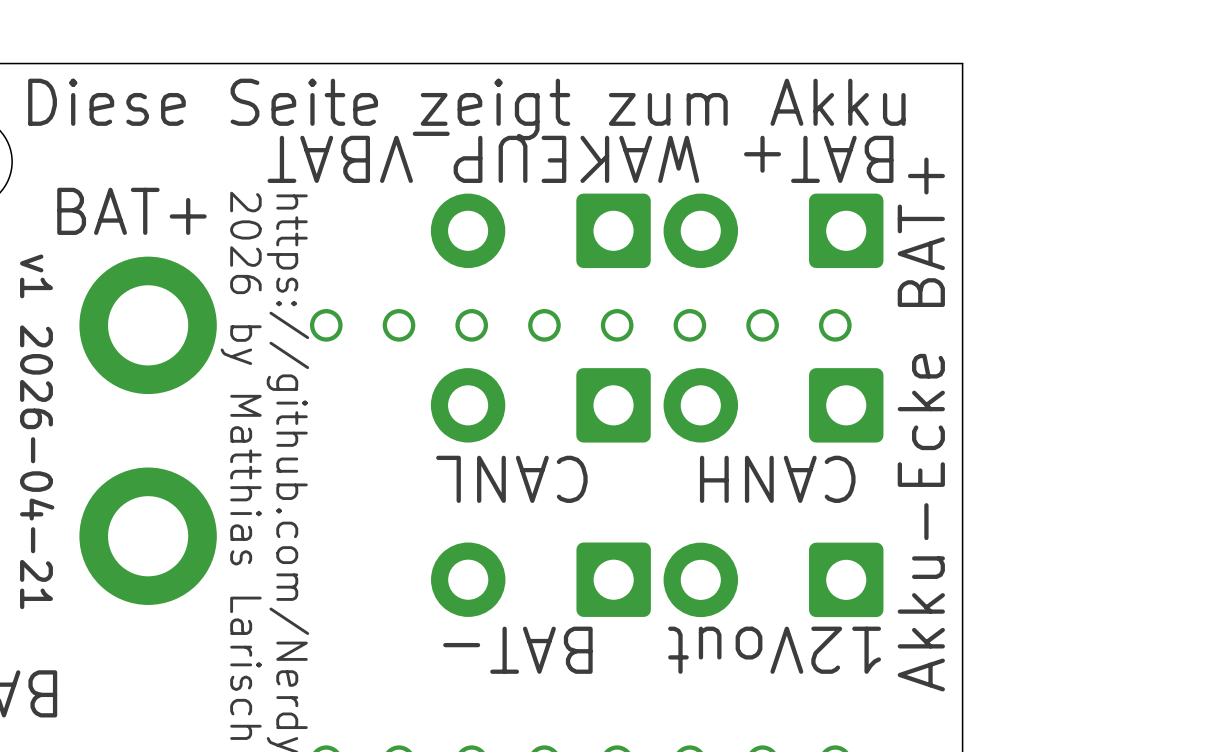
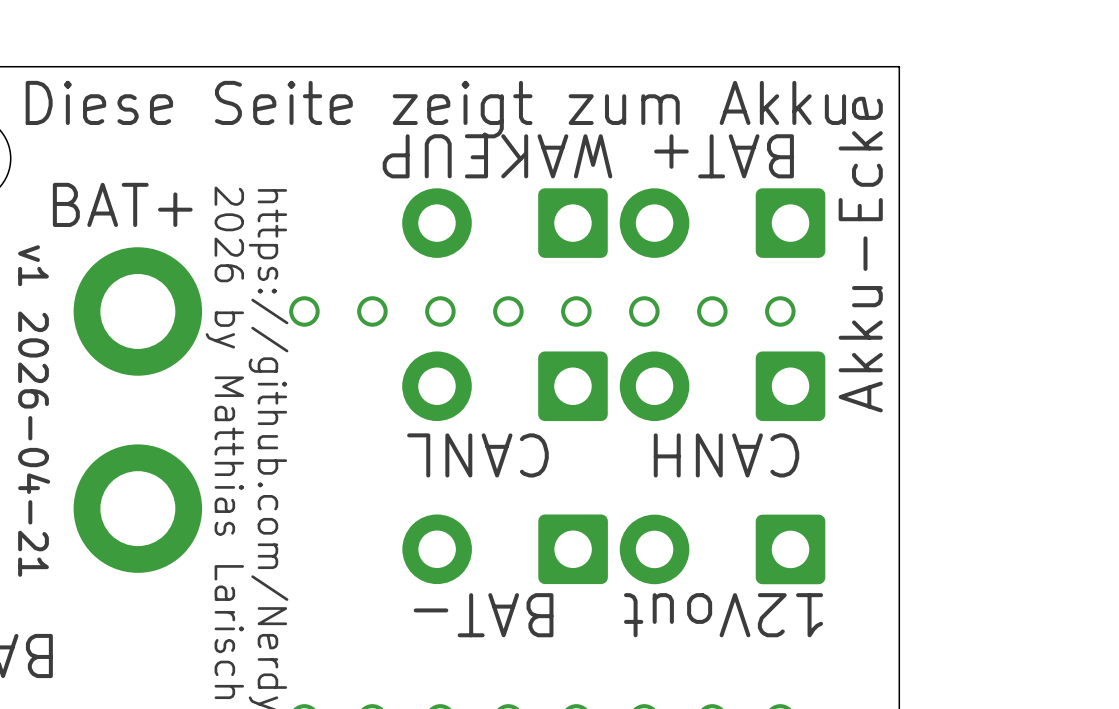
text: BAT+ WAKEUP_VBAT (580, 157) -> BAT+ WAKEUP (588, 156)
text: Akku-Ecke BAT+ (921, 424) -> Akku-Ecke (860, 254)

